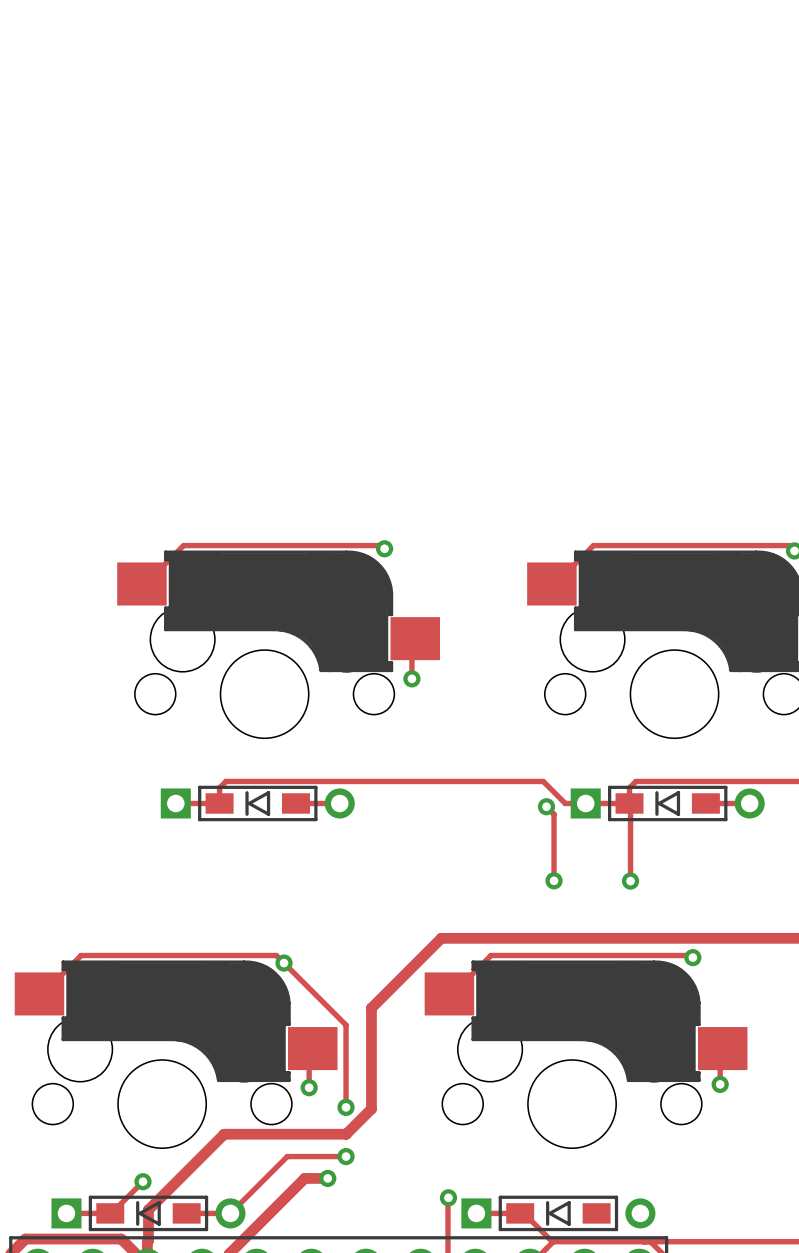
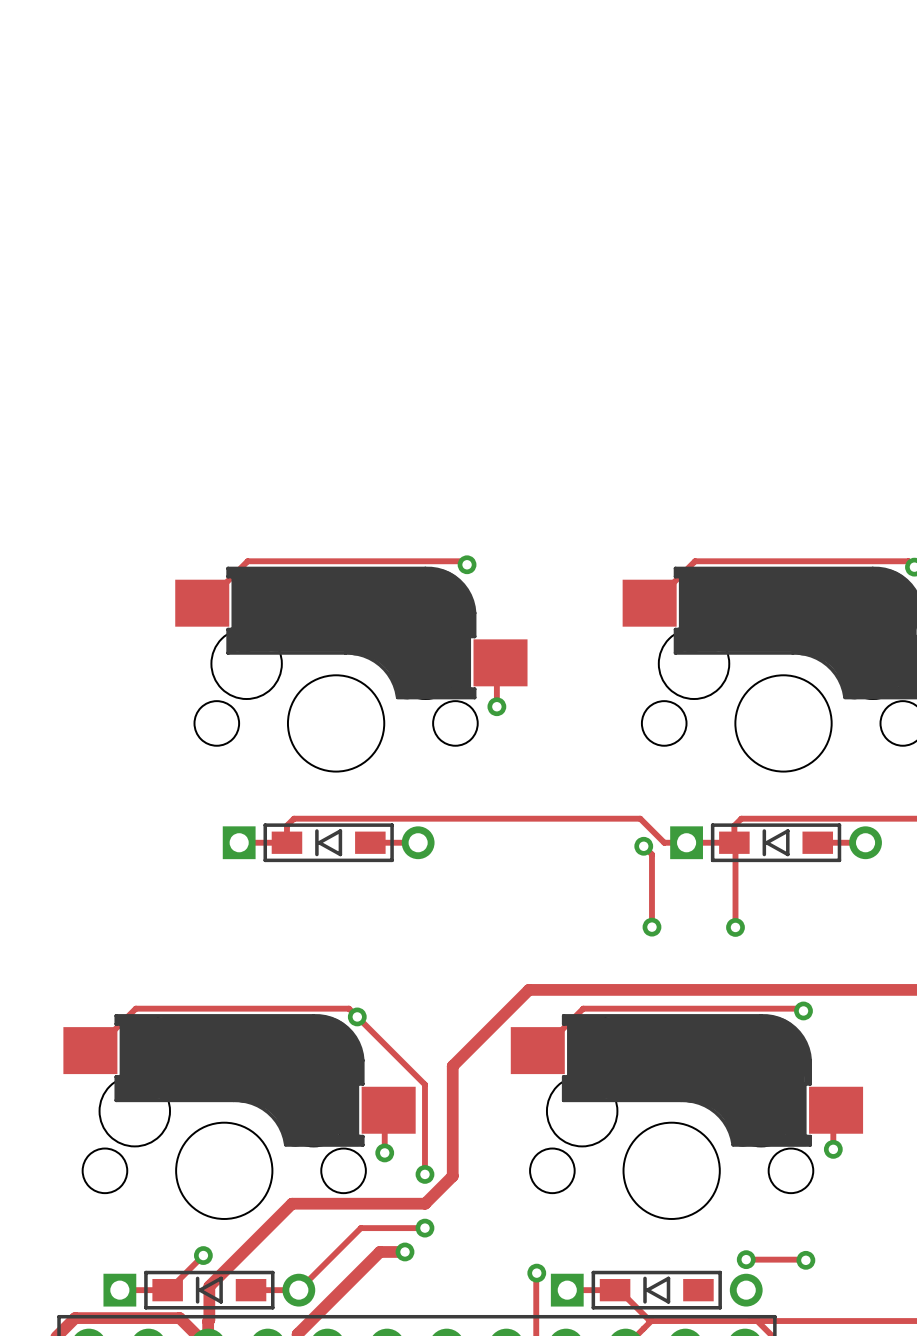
track: none -> (746, 1259) (805, 1260)
via: none -> (746, 1259)
via: none -> (805, 1260)

